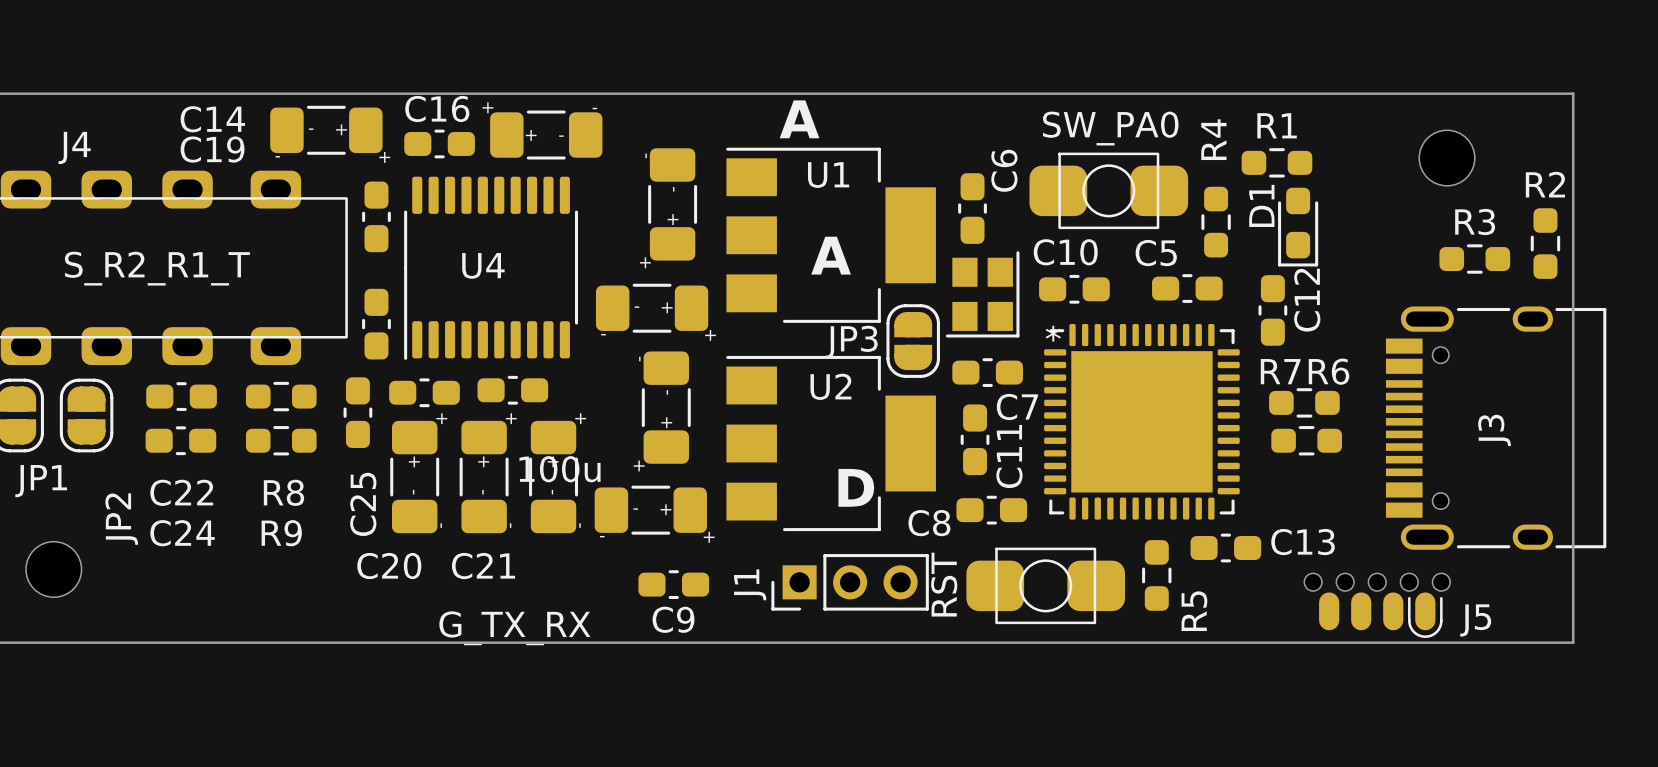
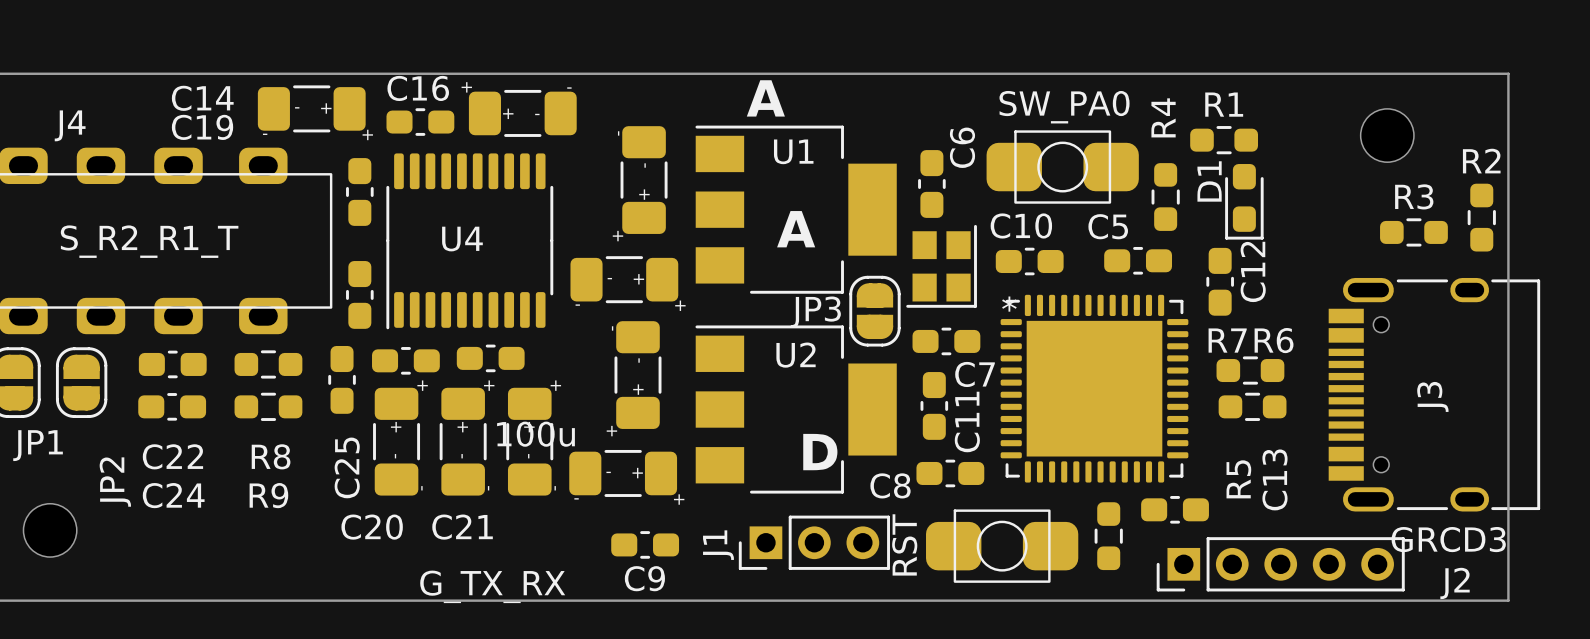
C13 name rotation: 0° (1303, 542) -> 90° counterclockwise (1274, 479)
text: none -> GRCD3 (1448, 539)
J2: none -> (1280, 564)
J5: (1377, 605) -> none
R5 name position: R5 (1194, 611) -> R5 (1238, 479)

